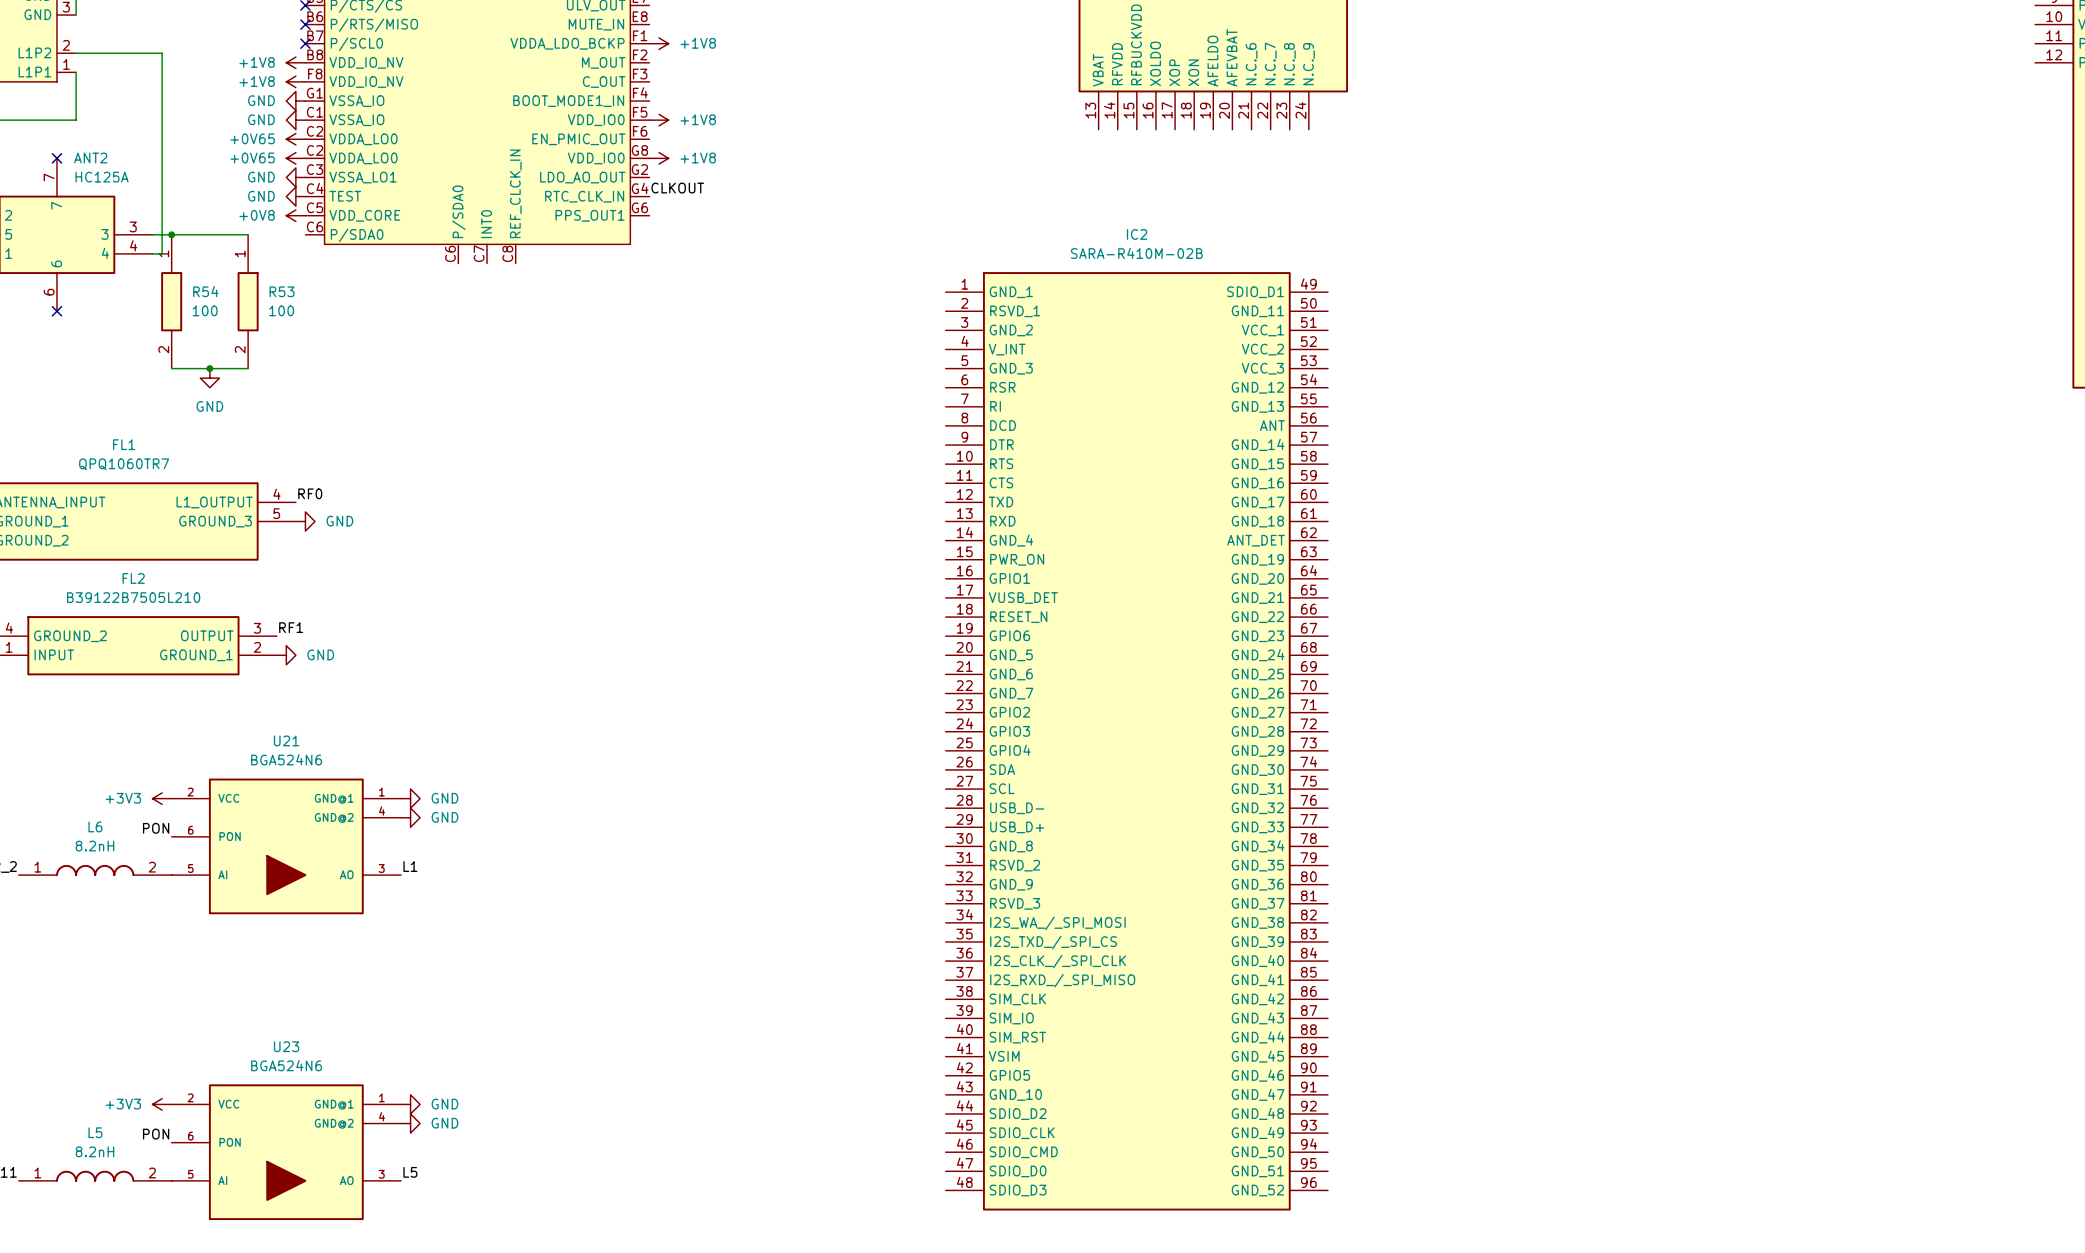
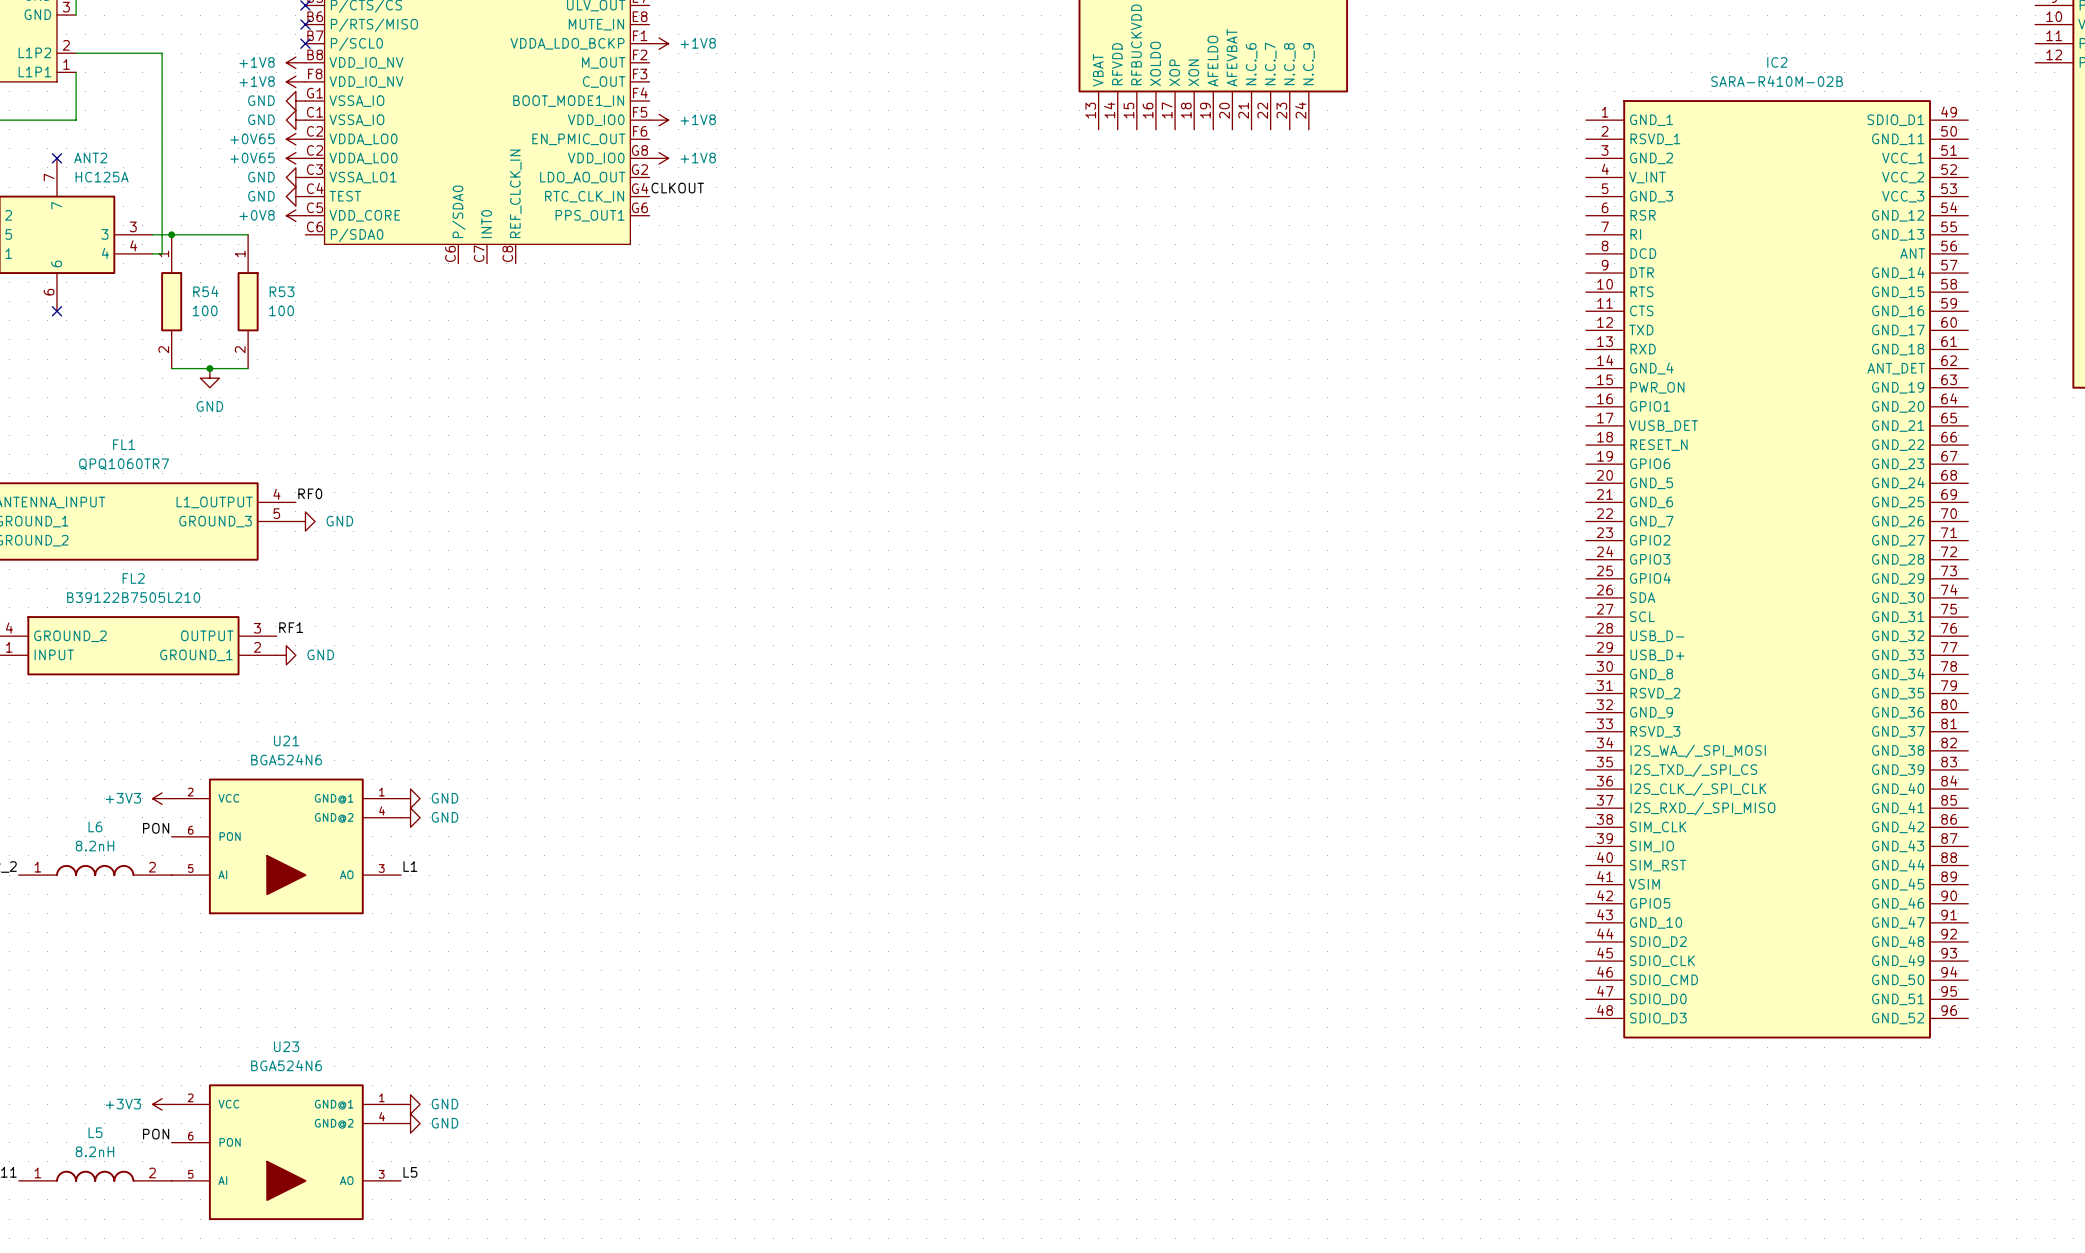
IC2 position: (1136, 741) -> (1777, 569)

